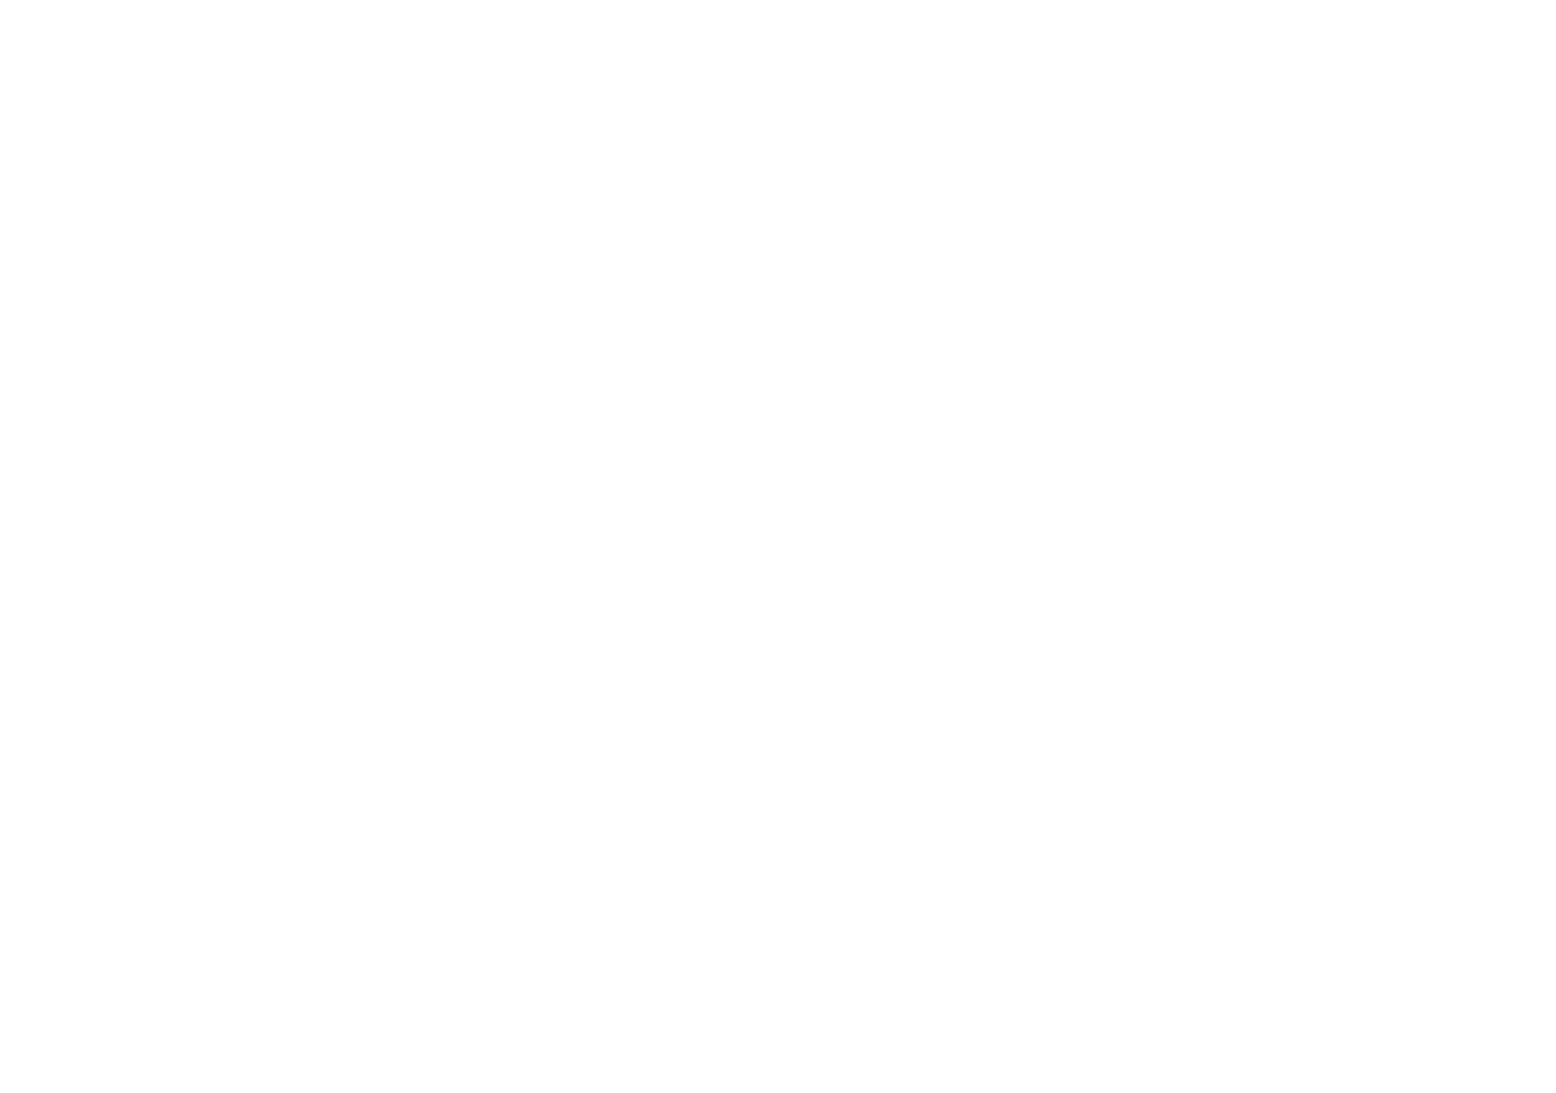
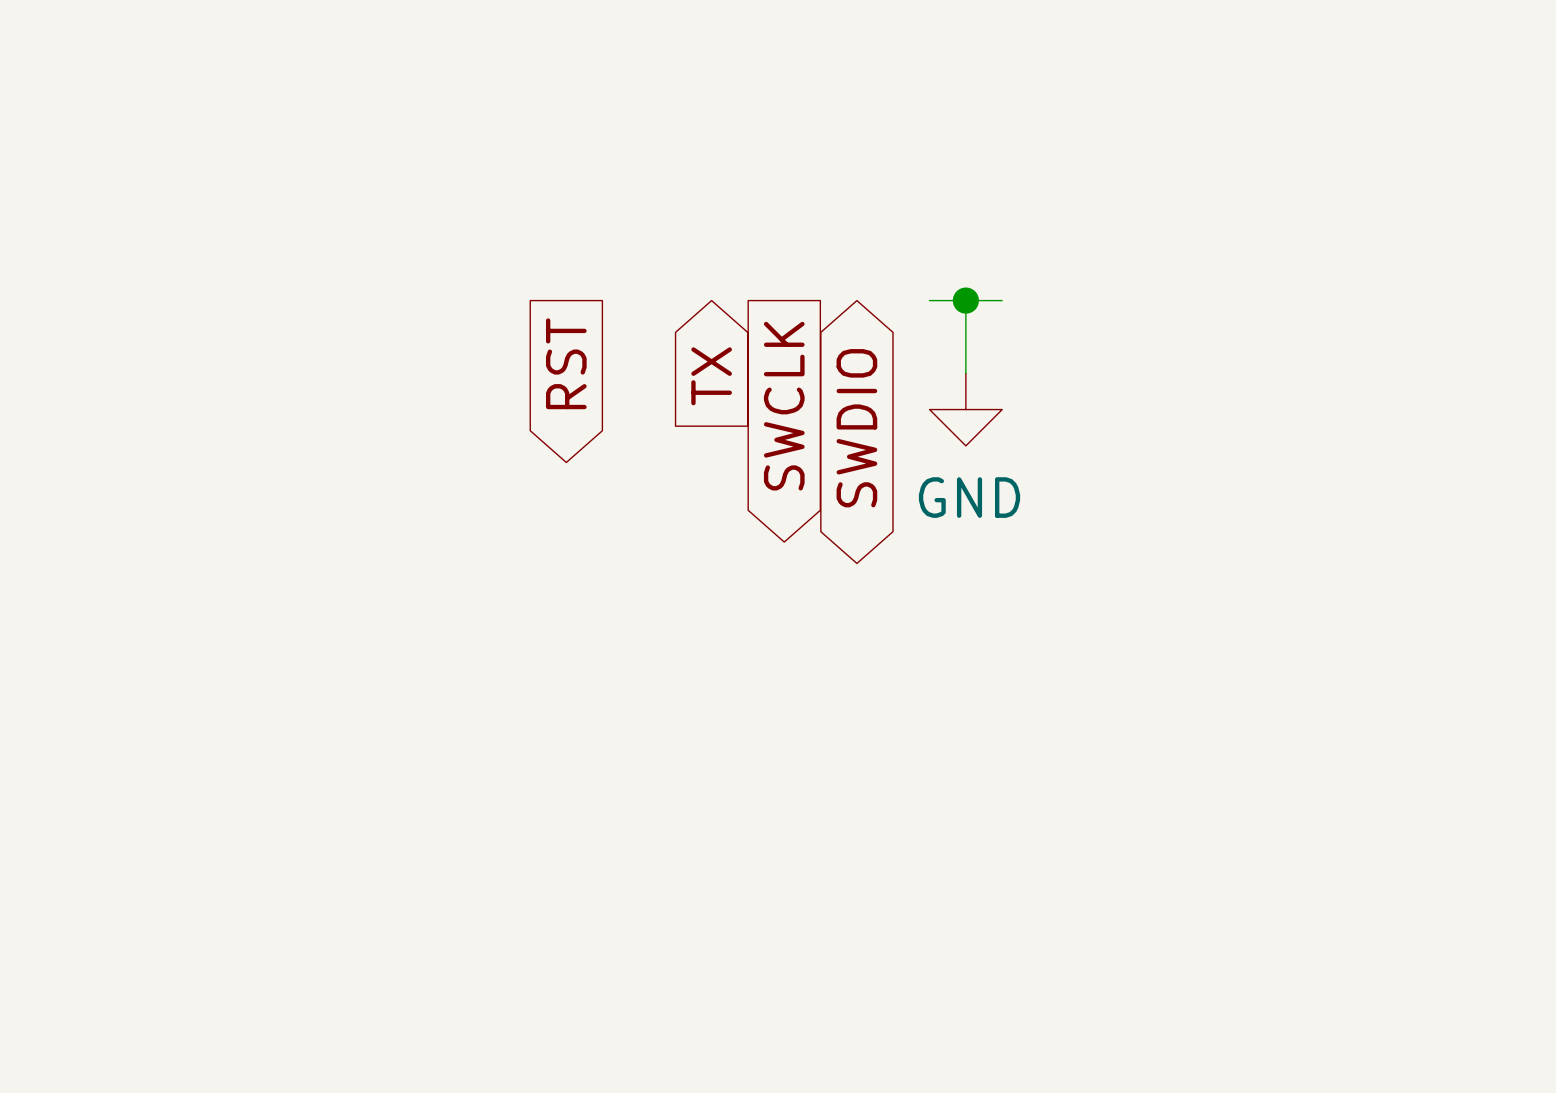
wire: none -> (929, 300) (1002, 300)
wire: none -> (965, 300) (965, 373)
junction: none -> (965, 300)
global label: none -> RST (566, 363)
global label: none -> TX (711, 376)
global label: none -> SWCLK (784, 406)
power symbol: none -> GND (965, 409)
global label: none -> SWDIO (856, 428)

